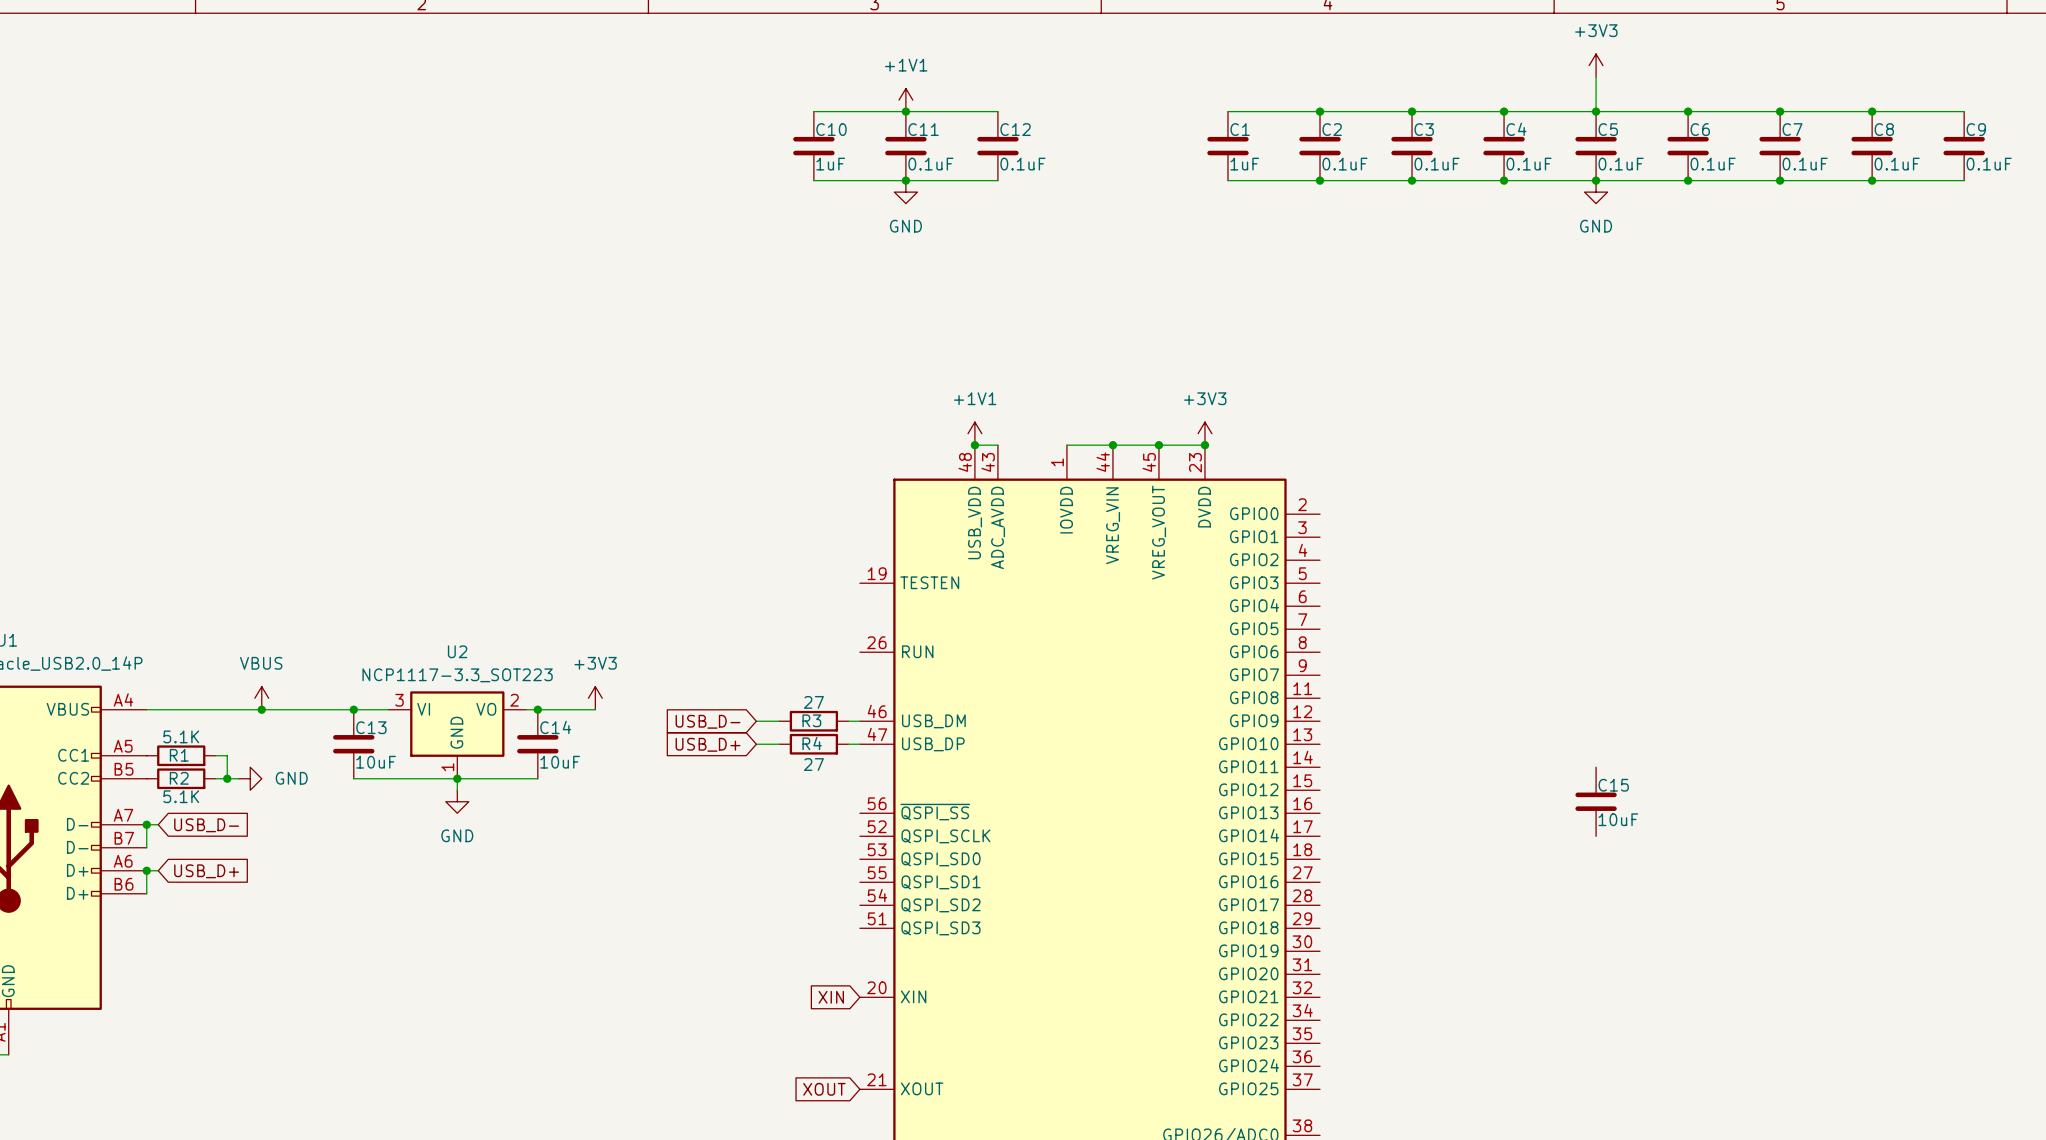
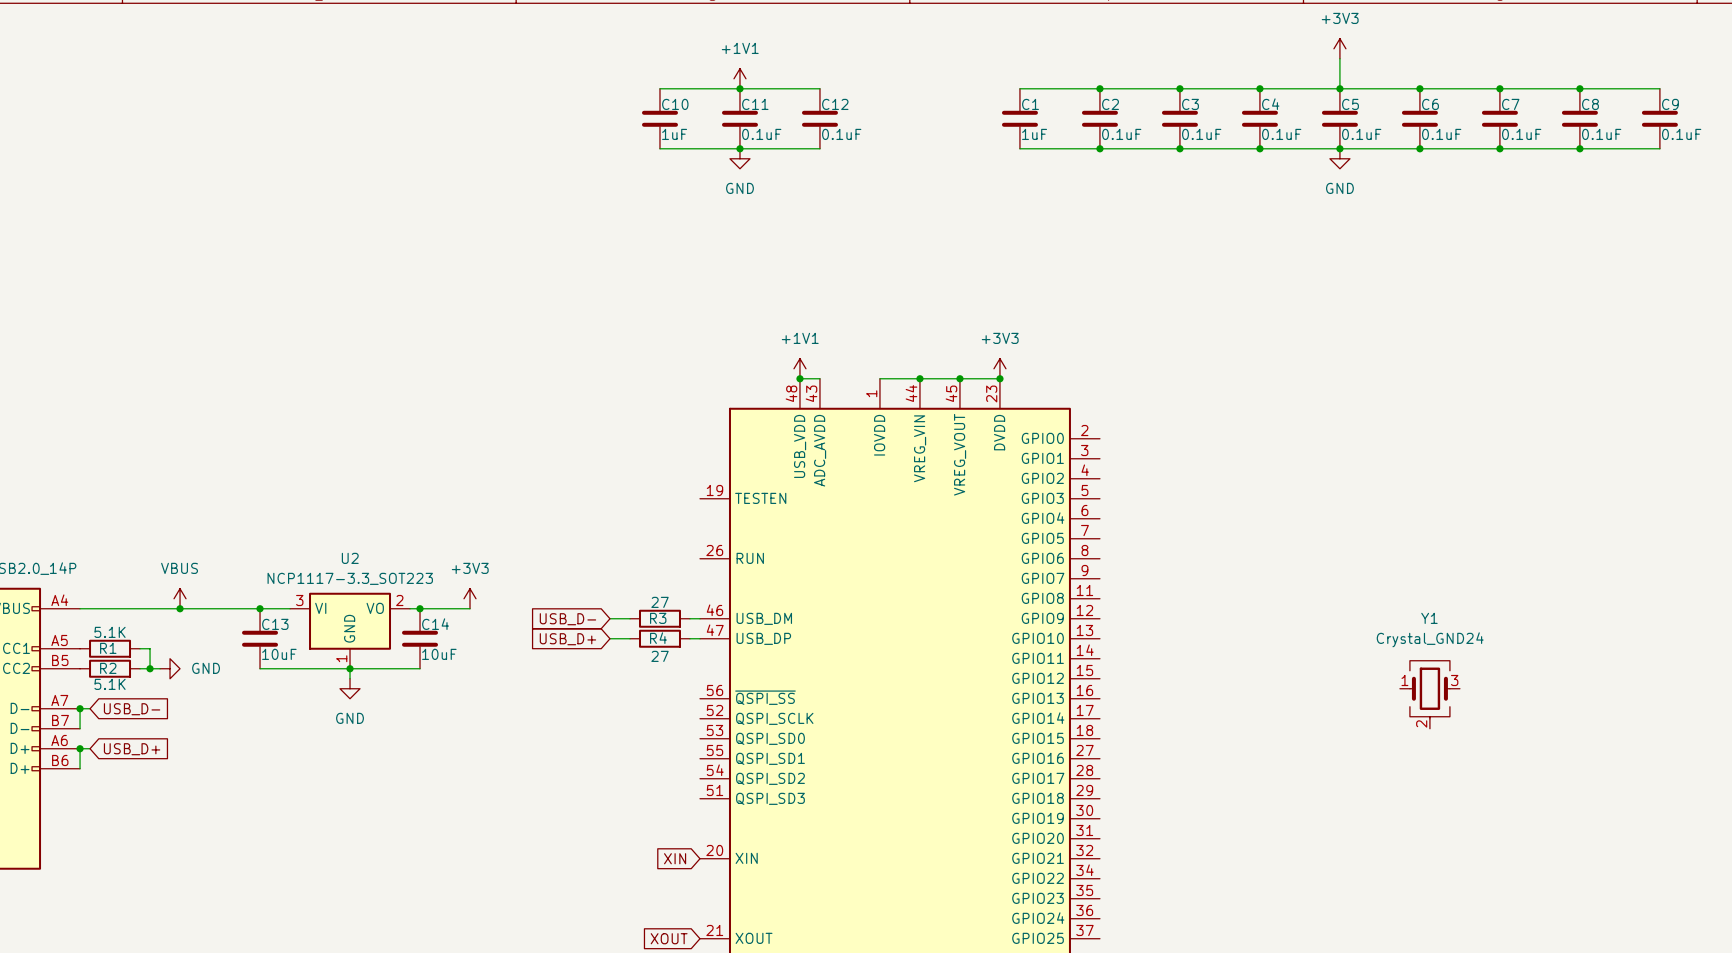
C15: 10uF (1596, 801) -> none
Y1: none -> Crystal_GND24 (1429, 694)

